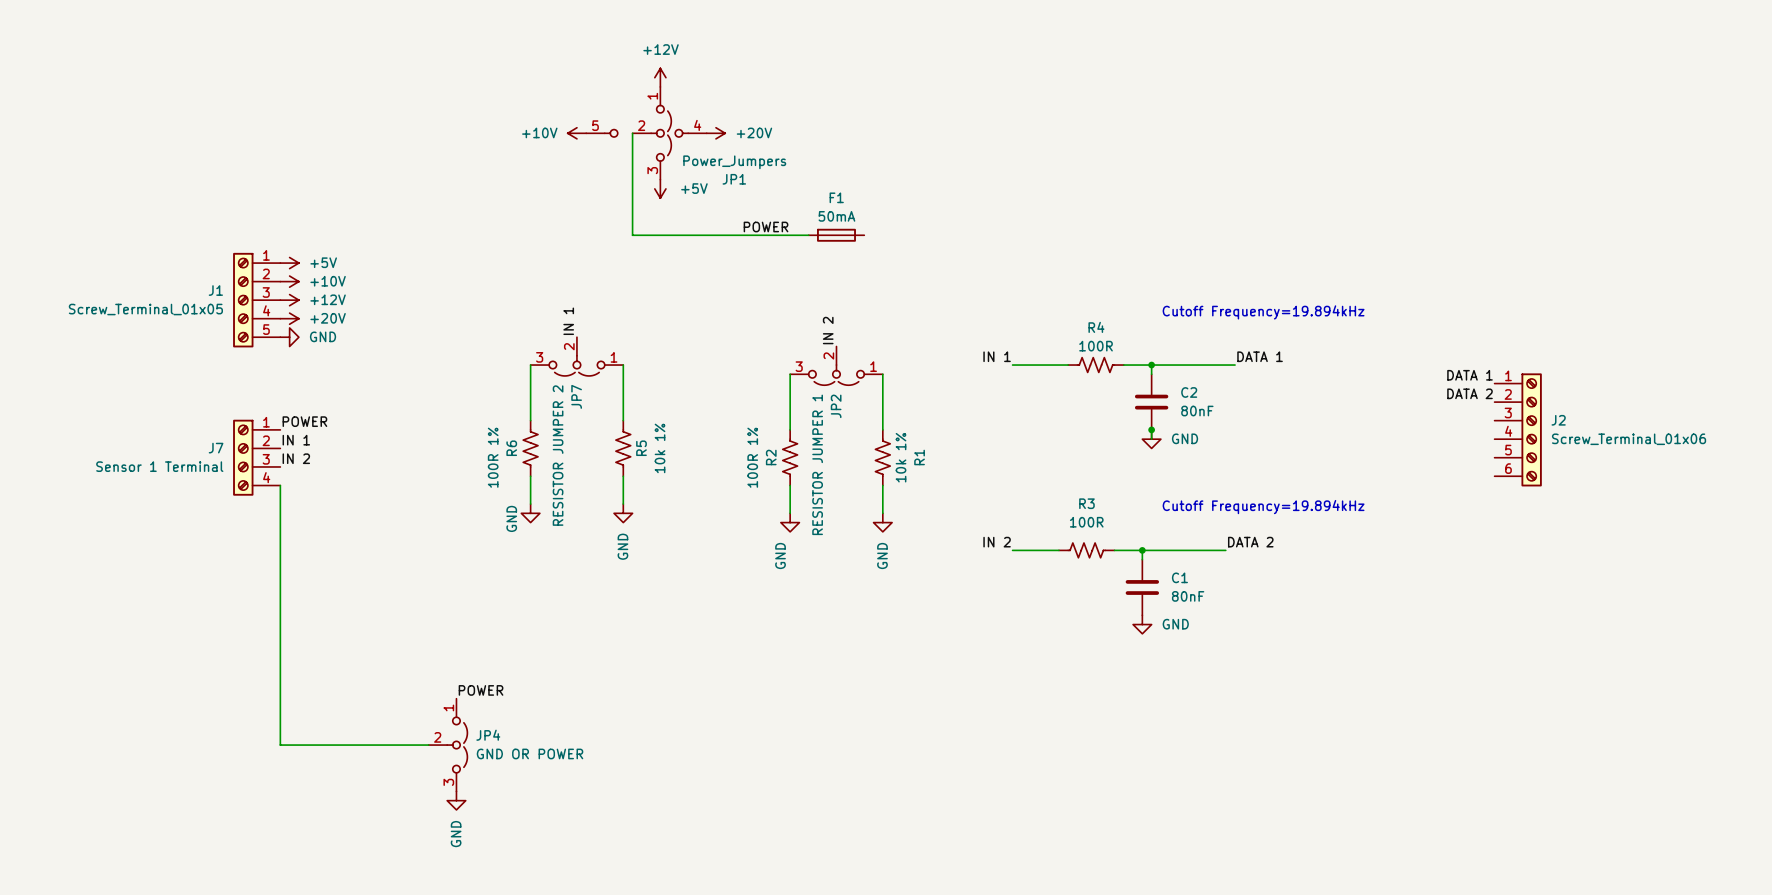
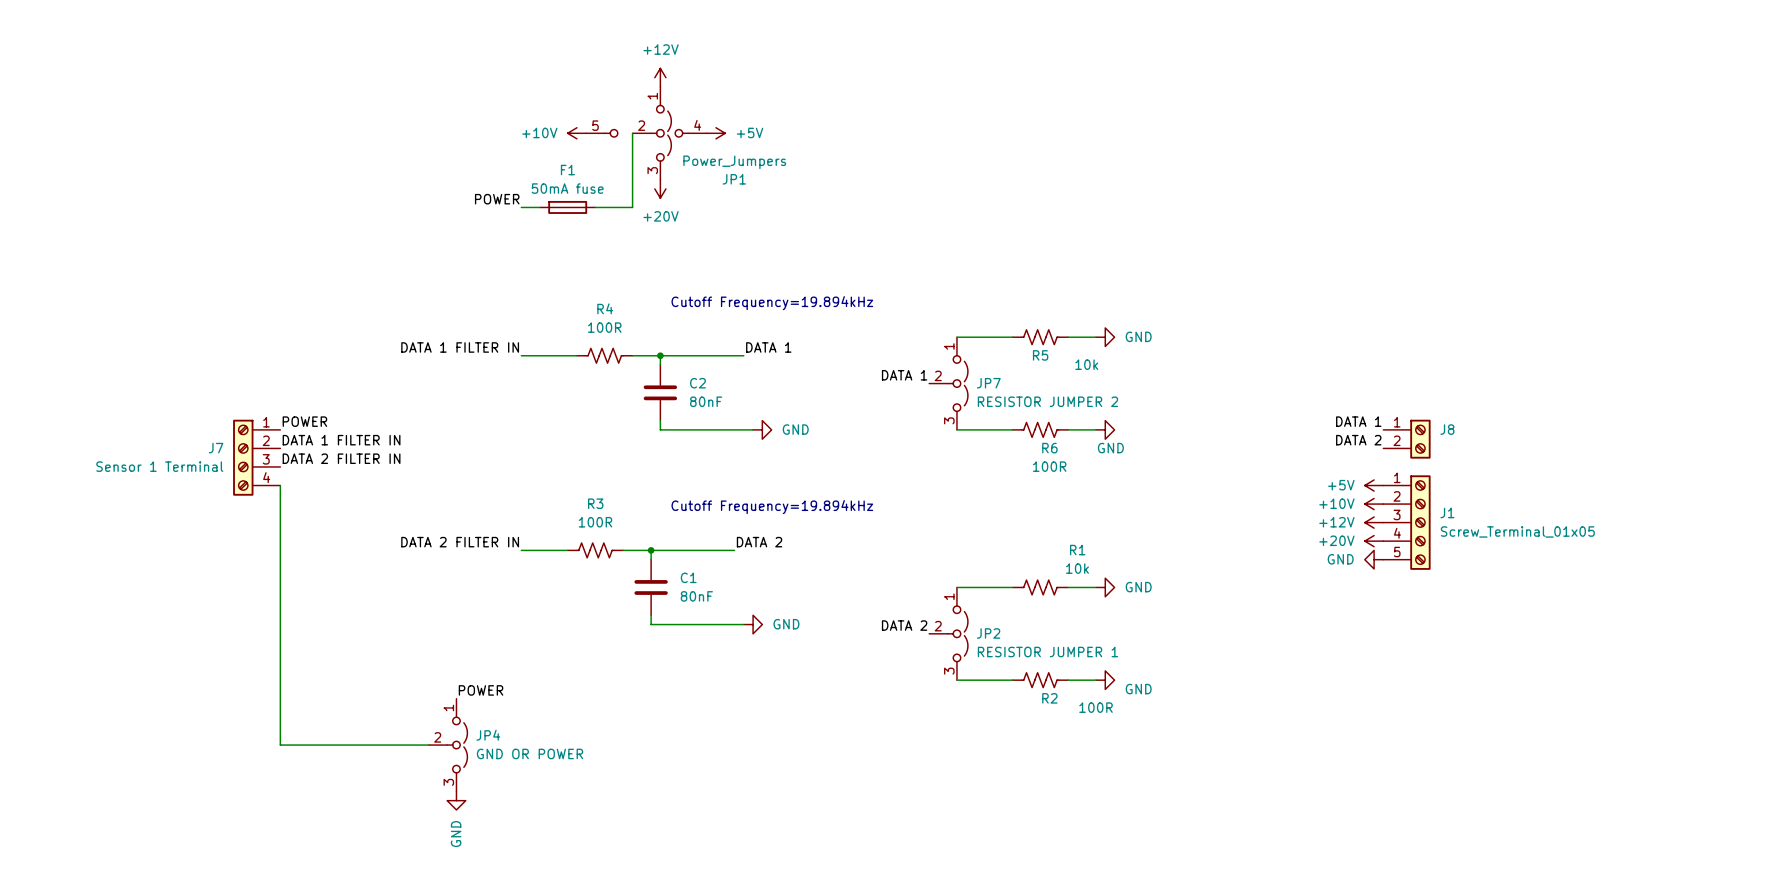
power symbol: +20V (715, 133) -> +5V (715, 133)
power symbol: +5V (660, 188) -> +20V (660, 188)
label: none -> POWER (497, 199)
wire: none -> (521, 207) (539, 207)
wire: (632, 207) (632, 235) (808, 235) -> (632, 207) (595, 207)
F1 value: 50mA (836, 216) -> 50mA fuse (567, 188)
label: POWER (766, 226) -> none
F1 position: (836, 235) -> (567, 207)
power symbol: +5V (289, 263) -> none
power symbol: +10V (289, 281) -> none
J1 flip: as is (243, 300) -> left-right (1420, 522)
J1 position: (256, 300) -> (1406, 522)
power symbol: +12V (289, 300) -> none
text: none -> Cutoff Frequency=19.894kHz (772, 303)
text: Cutoff Frequency=19.894kHz (1263, 312) -> none
power symbol: +20V (289, 318) -> none
label: IN 1 (568, 321) -> none
R4 name position: R4 (1096, 327) -> R4 (605, 308)
label: IN 2 (828, 330) -> none
power symbol: GND (289, 337) -> none
wire: none -> (1068, 337) (1096, 337)
power symbol: none -> GND (1105, 337)
R4 value position: 100R (1096, 346) -> 100R (604, 327)
label: none -> DATA 1 FILTER IN (460, 347)
label: none -> DATA 1 (768, 347)
wire: none -> (521, 355) (576, 355)
wire: none -> (632, 355) (743, 355)
wire: none -> (660, 355) (660, 365)
junction: none -> (660, 355)
JP7 position: (576, 356) -> (948, 383)
label: IN 1 (997, 356) -> none
label: DATA 1 (1260, 356) -> none
wire: (530, 365) (530, 420) -> none
JP7 rotation: 0° (576, 365) -> 90° counterclockwise (957, 383)
wire: (623, 365) (623, 420) -> none
JP2 position: (836, 365) -> (948, 633)
wire: (1012, 365) (1068, 365) -> (956, 337) (1012, 337)
R4 position: (1096, 365) -> (604, 355)
wire: (1123, 365) (1235, 365) -> none
wire: (1151, 365) (1151, 374) -> none
junction: (1151, 365) -> none
wire: (790, 374) (790, 429) -> none
wire: (882, 374) (882, 429) -> none
JP2 rotation: 0° (836, 375) -> 90° counterclockwise (957, 633)
label: none -> DATA 1 (904, 375)
label: DATA 1 (1470, 375) -> none
label: DATA 2 (1470, 393) -> none
C2 position: (1151, 402) -> (660, 392)
wire: none -> (660, 420) (660, 429) (753, 429)
label: none -> DATA 1 (1358, 421)
power symbol: none -> GND (762, 429)
wire: none -> (956, 429) (1012, 429)
wire: none -> (1068, 429) (1096, 429)
wire: (1151, 429) (1151, 439) -> none
junction: (1151, 429) -> none
J2: Screw_Terminal_01x06 (1518, 429) -> none
power symbol text position: GND (1185, 438) -> GND (1110, 448)
power symbol rotation: 0° (1151, 439) -> 90° counterclockwise (1105, 429)
power symbol position: GND (1151, 439) -> GND (1105, 429)
J8: none -> (1406, 439)
label: IN 1 (296, 440) -> DATA 1 FILTER IN (341, 440)
label: none -> DATA 2 (1358, 440)
R6 name position: R6 (511, 448) -> R6 (1049, 448)
R6 rotation: 0° (530, 448) -> 90° clockwise (1040, 429)
R6 position: (530, 448) -> (1040, 429)
R5 rotation: 0° (623, 448) -> 90° clockwise (1040, 337)
R5 position: (623, 448) -> (1040, 337)
R5 value: 10k 1% (660, 448) -> 10k (1086, 364)
R6 value: 100R 1% (493, 457) -> 100R (1049, 466)
R2 value: 100R 1% (752, 457) -> 100R (1096, 707)
R2 name position: R2 (771, 457) -> R2 (1049, 698)
R2 rotation: 0° (790, 457) -> 90° clockwise (1040, 680)
R2 position: (790, 457) -> (1040, 680)
R1 rotation: 0° (882, 457) -> 90° clockwise (1040, 587)
R1 position: (882, 457) -> (1040, 587)
R1 value: 10k 1% (901, 457) -> 10k (1077, 568)
R1 name position: R1 (919, 457) -> R1 (1077, 550)
label: IN 2 (296, 458) -> DATA 2 FILTER IN (341, 458)
wire: (530, 476) (530, 504) -> none
wire: (623, 476) (623, 504) -> none
wire: (790, 485) (790, 513) -> none
wire: (882, 485) (882, 513) -> none
power symbol: none -> +5V (1374, 485)
power symbol: none -> +10V (1374, 504)
text: none -> Cutoff Frequency=19.894kHz (772, 507)
text: Cutoff Frequency=19.894kHz (1263, 507) -> none
power symbol: GND (530, 513) -> none
power symbol: GND (623, 513) -> none
power symbol: GND (790, 522) -> none
power symbol: GND (882, 522) -> none
power symbol: none -> +12V (1374, 522)
power symbol: none -> +20V (1374, 541)
label: none -> DATA 2 FILTER IN (460, 542)
label: none -> DATA 2 (759, 542)
label: IN 2 (997, 542) -> none
label: DATA 2 (1250, 542) -> none
wire: none -> (521, 550) (567, 550)
wire: none -> (623, 550) (734, 550)
wire: none -> (651, 550) (651, 559)
junction: none -> (651, 550)
wire: (1012, 550) (1058, 550) -> none
R3 position: (1086, 550) -> (595, 550)
wire: (1114, 550) (1225, 550) -> none
wire: (1142, 550) (1142, 559) -> none
junction: (1142, 550) -> none
power symbol: none -> GND (1374, 559)
wire: none -> (956, 587) (1012, 587)
wire: none -> (1068, 587) (1096, 587)
power symbol: none -> GND (1105, 587)
C1 position: (1142, 587) -> (651, 587)
wire: none -> (651, 615) (651, 624) (743, 624)
power symbol: none -> GND (753, 624)
power symbol: GND (1142, 624) -> none
label: none -> DATA 2 (904, 625)
wire: none -> (956, 680) (1012, 680)
wire: none -> (1068, 680) (1096, 680)
power symbol: none -> GND (1105, 680)

